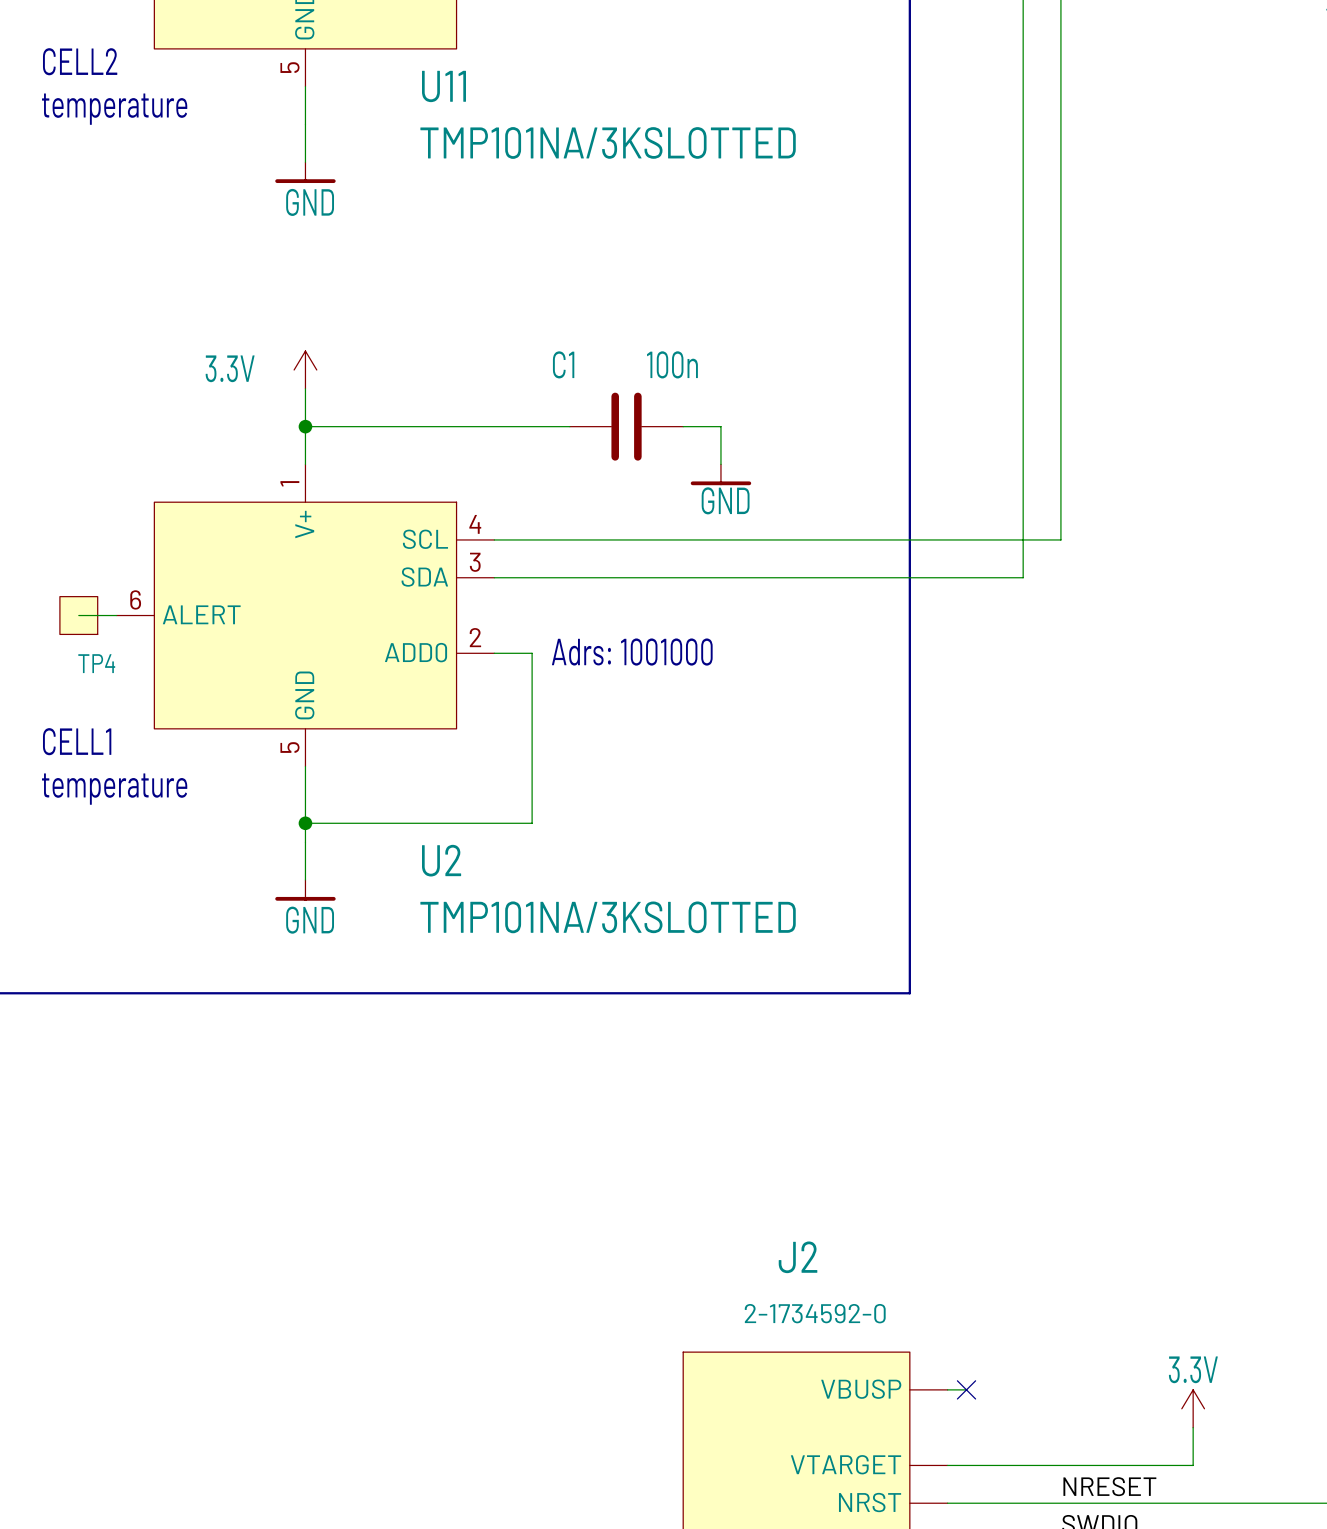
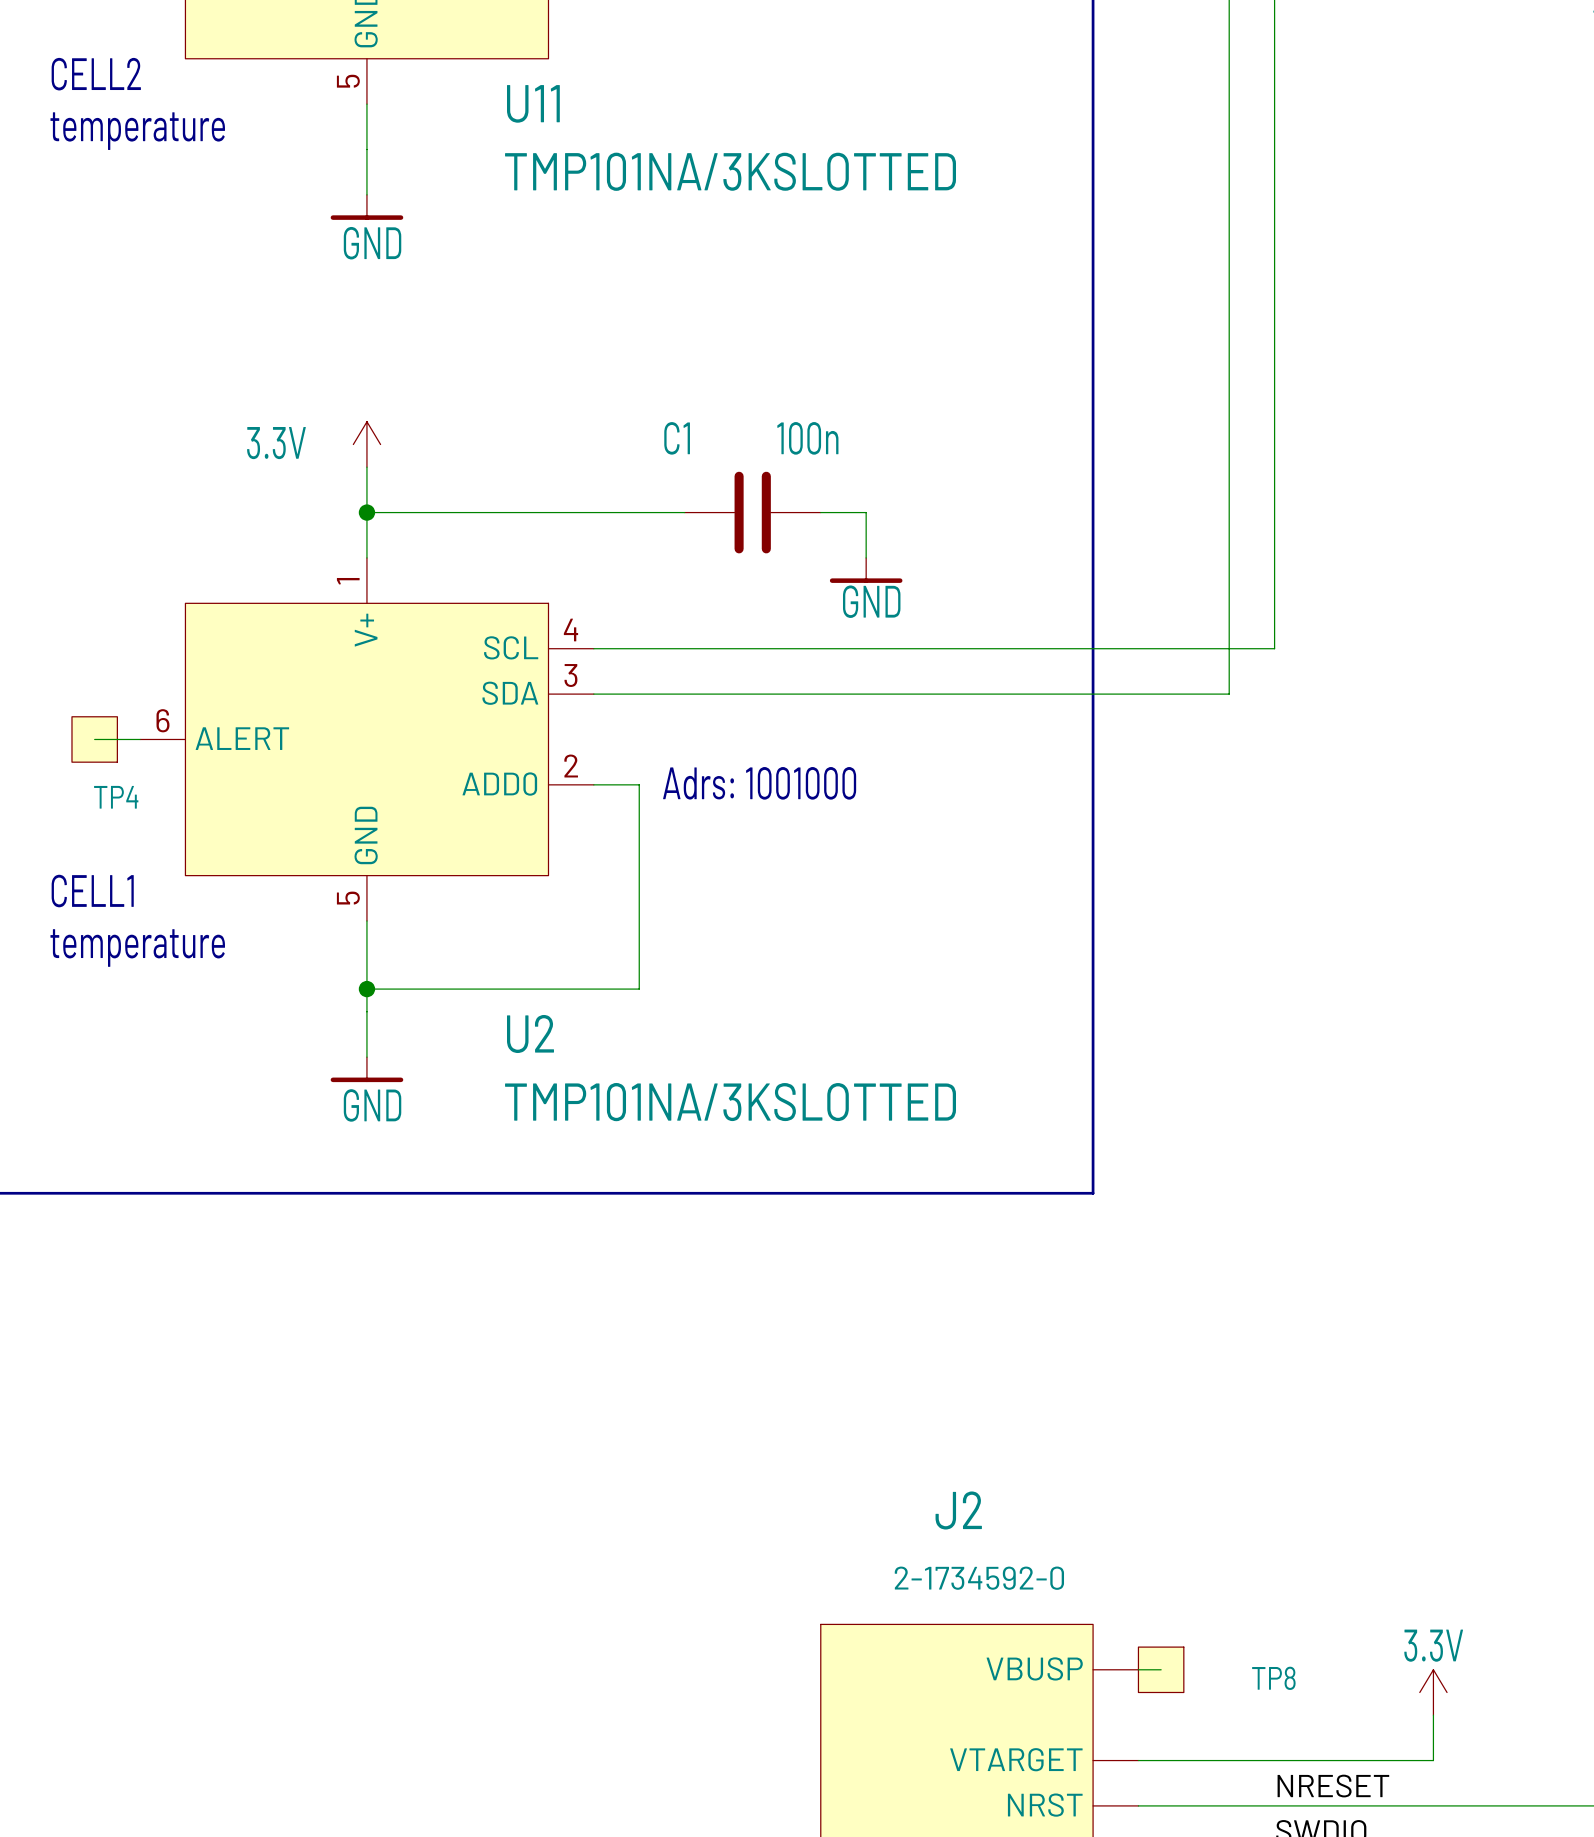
no-connect mark: (966, 1389) -> none
TP8: none -> (1161, 1669)

